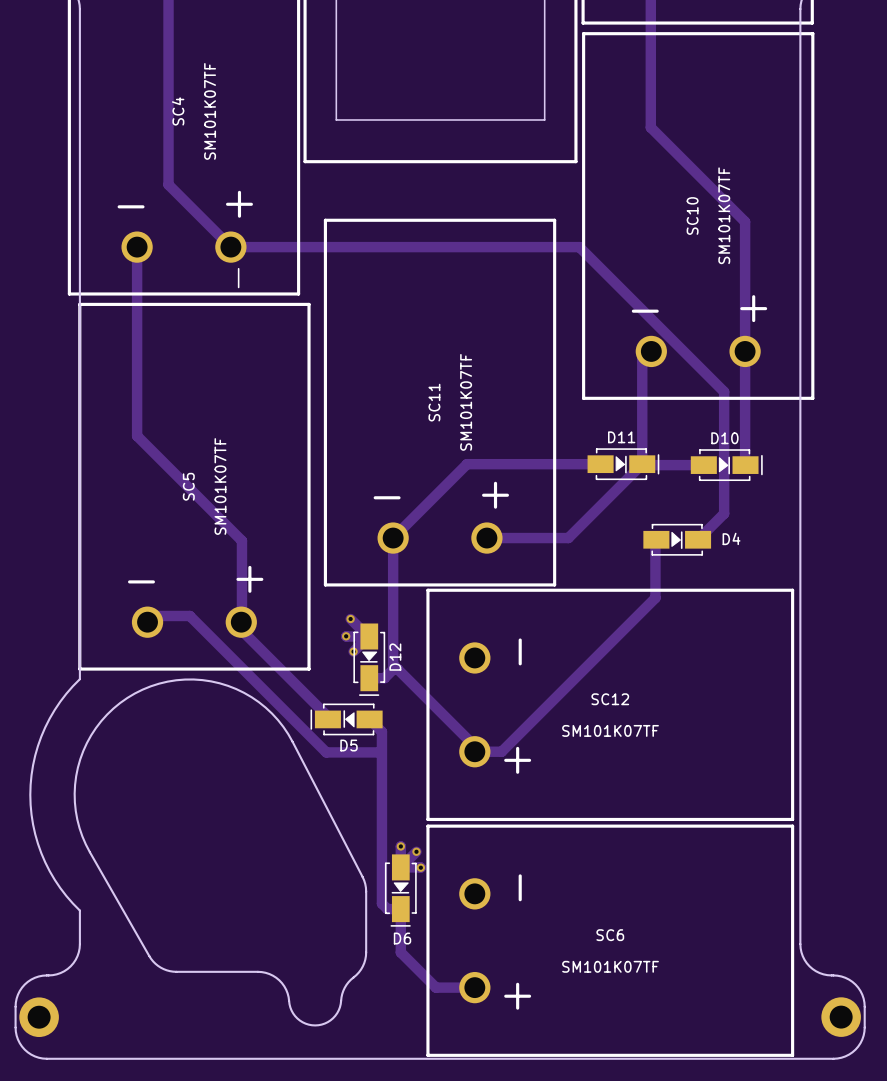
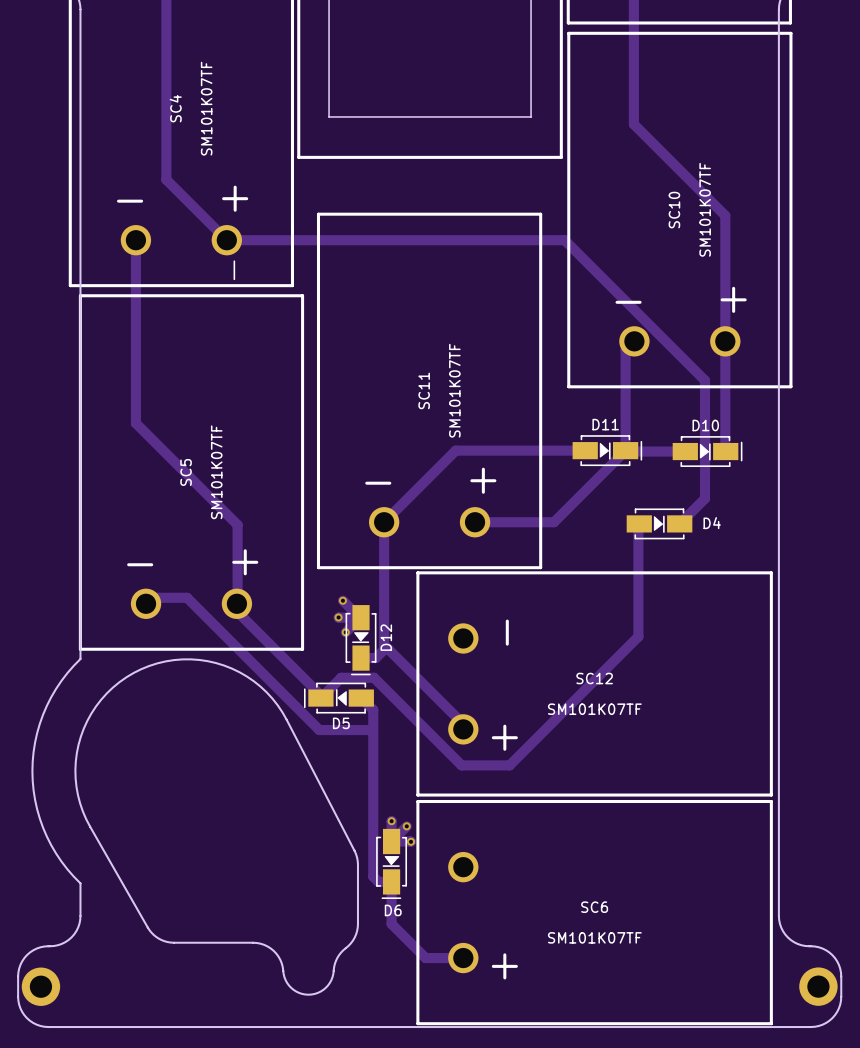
track: (655, 598) (501, 751) (474, 751) -> (638, 580) (638, 636) (509, 765) (461, 765) (374, 677) (341, 677) (320, 698)
SC6 text: - (520, 887) -> none

